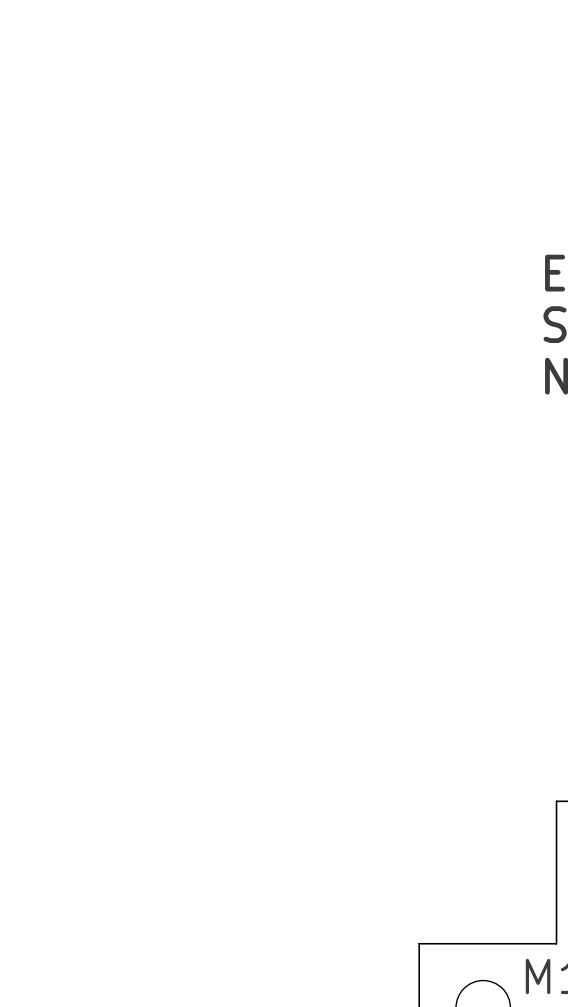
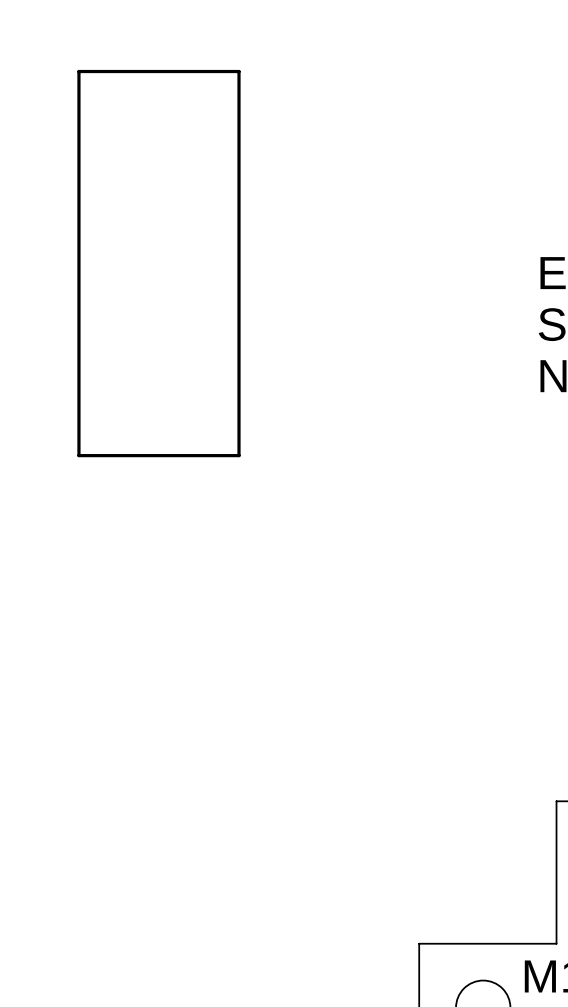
line: none -> (78, 71) (238, 71) (238, 455) (78, 455) (78, 71)

